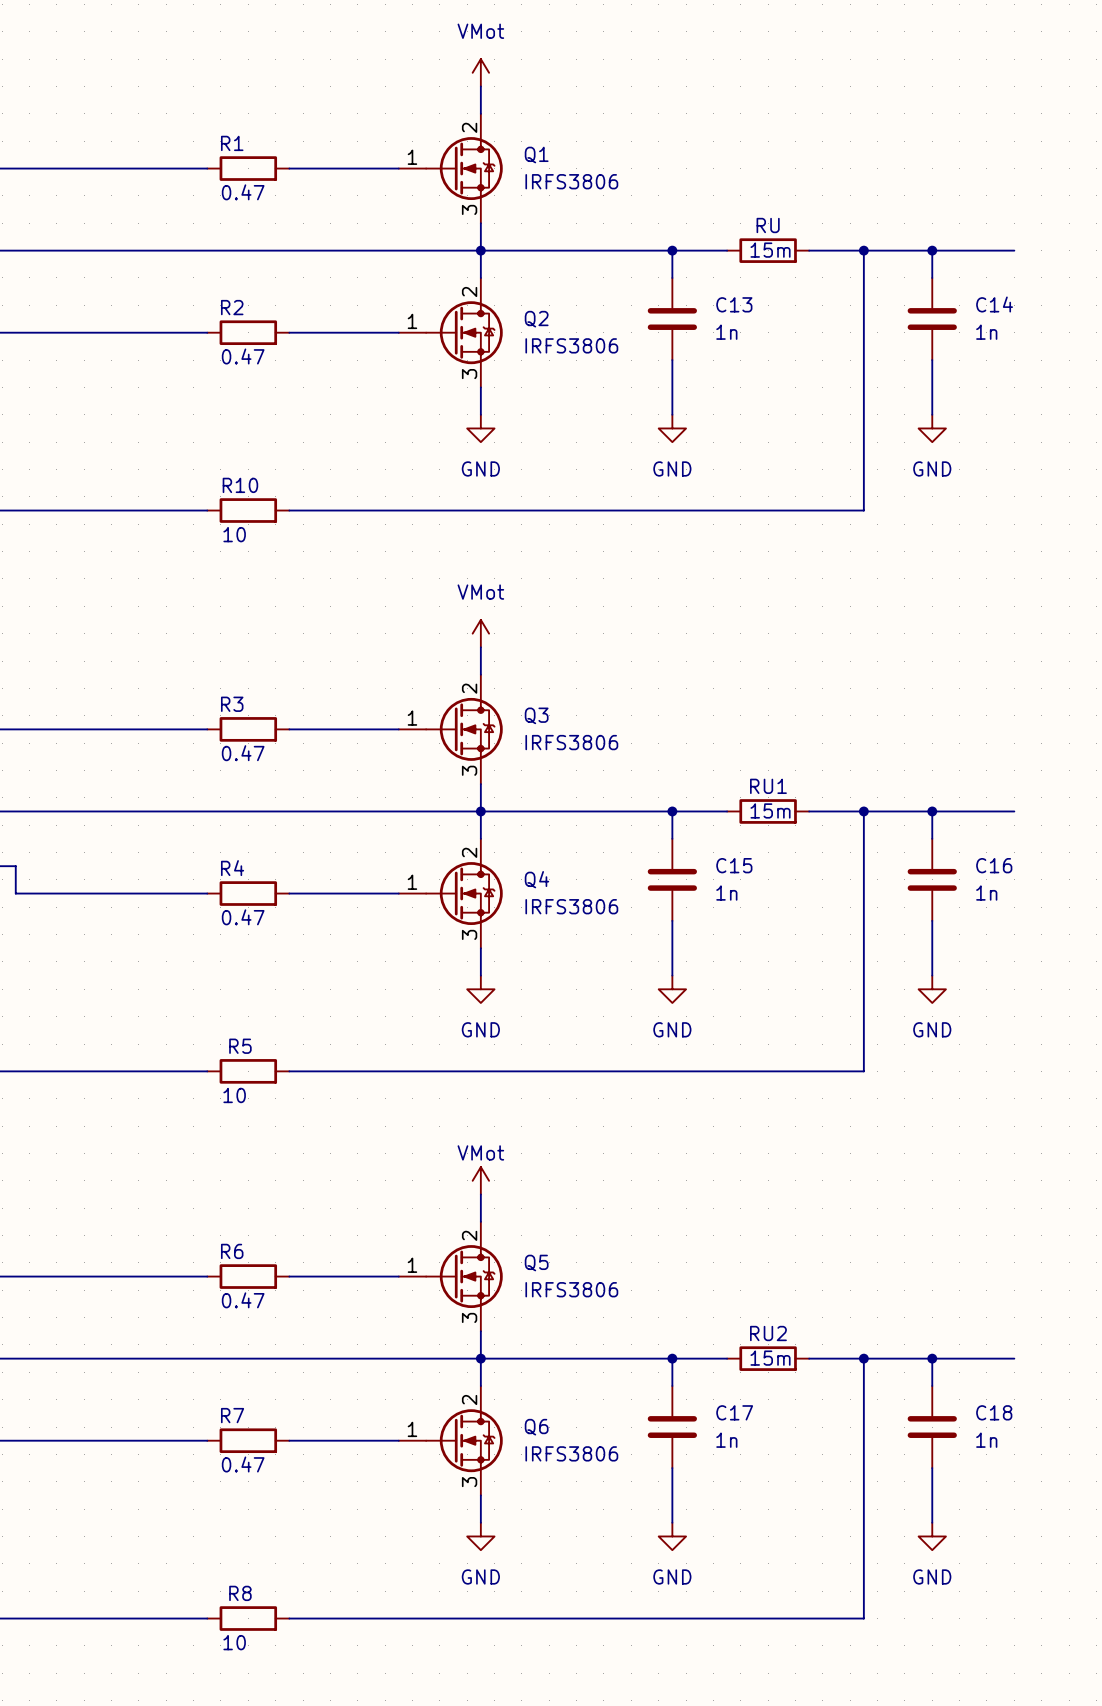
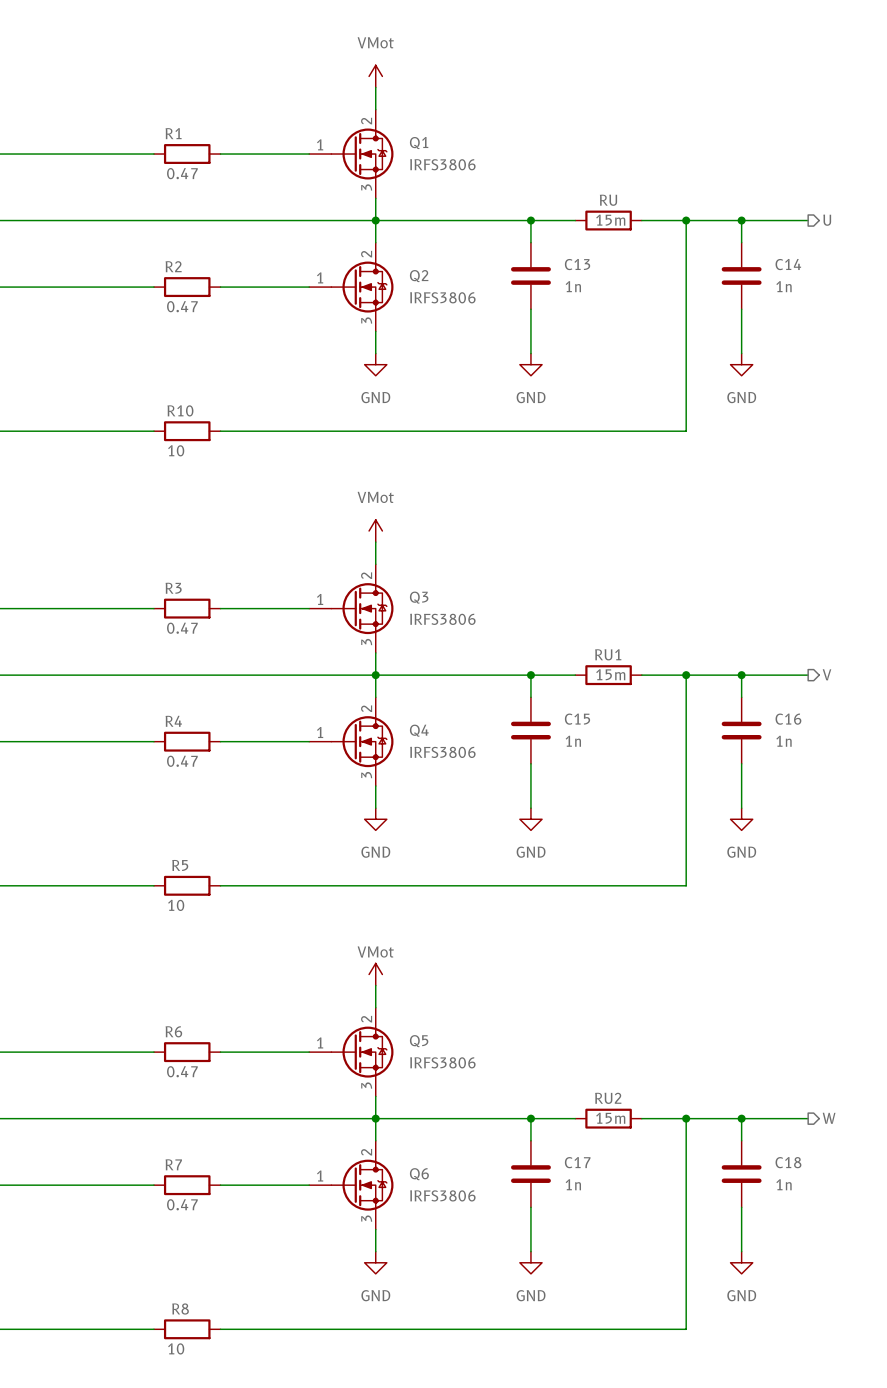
hierarchical label: none -> U (827, 220)
hierarchical label: none -> V (827, 674)
hierarchical label: none -> W (829, 1118)

